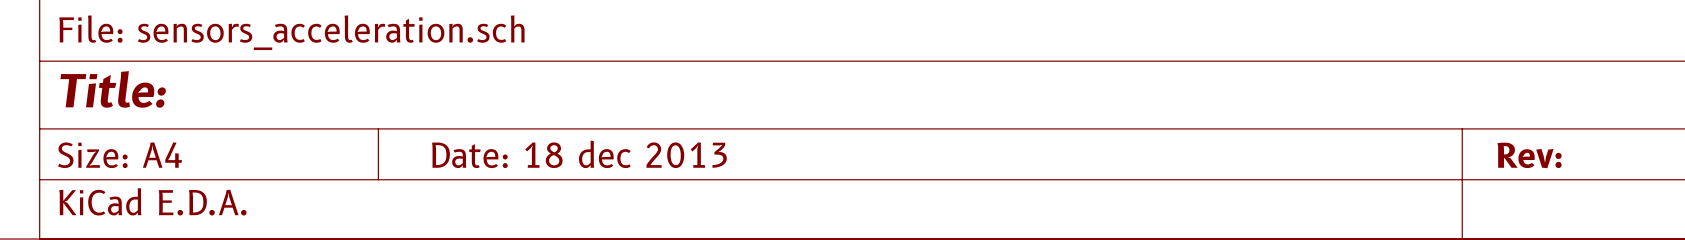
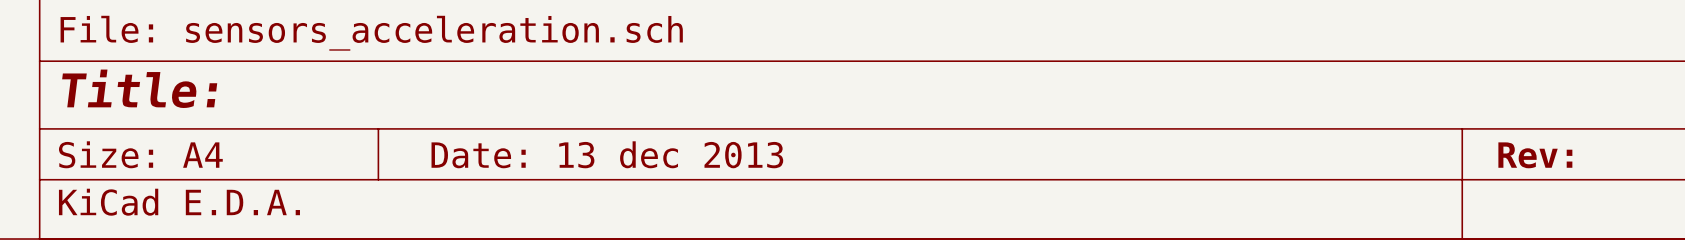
title block: Date: 18 dec 2013 (579, 154) -> Date: 13 dec 2013 (607, 154)

